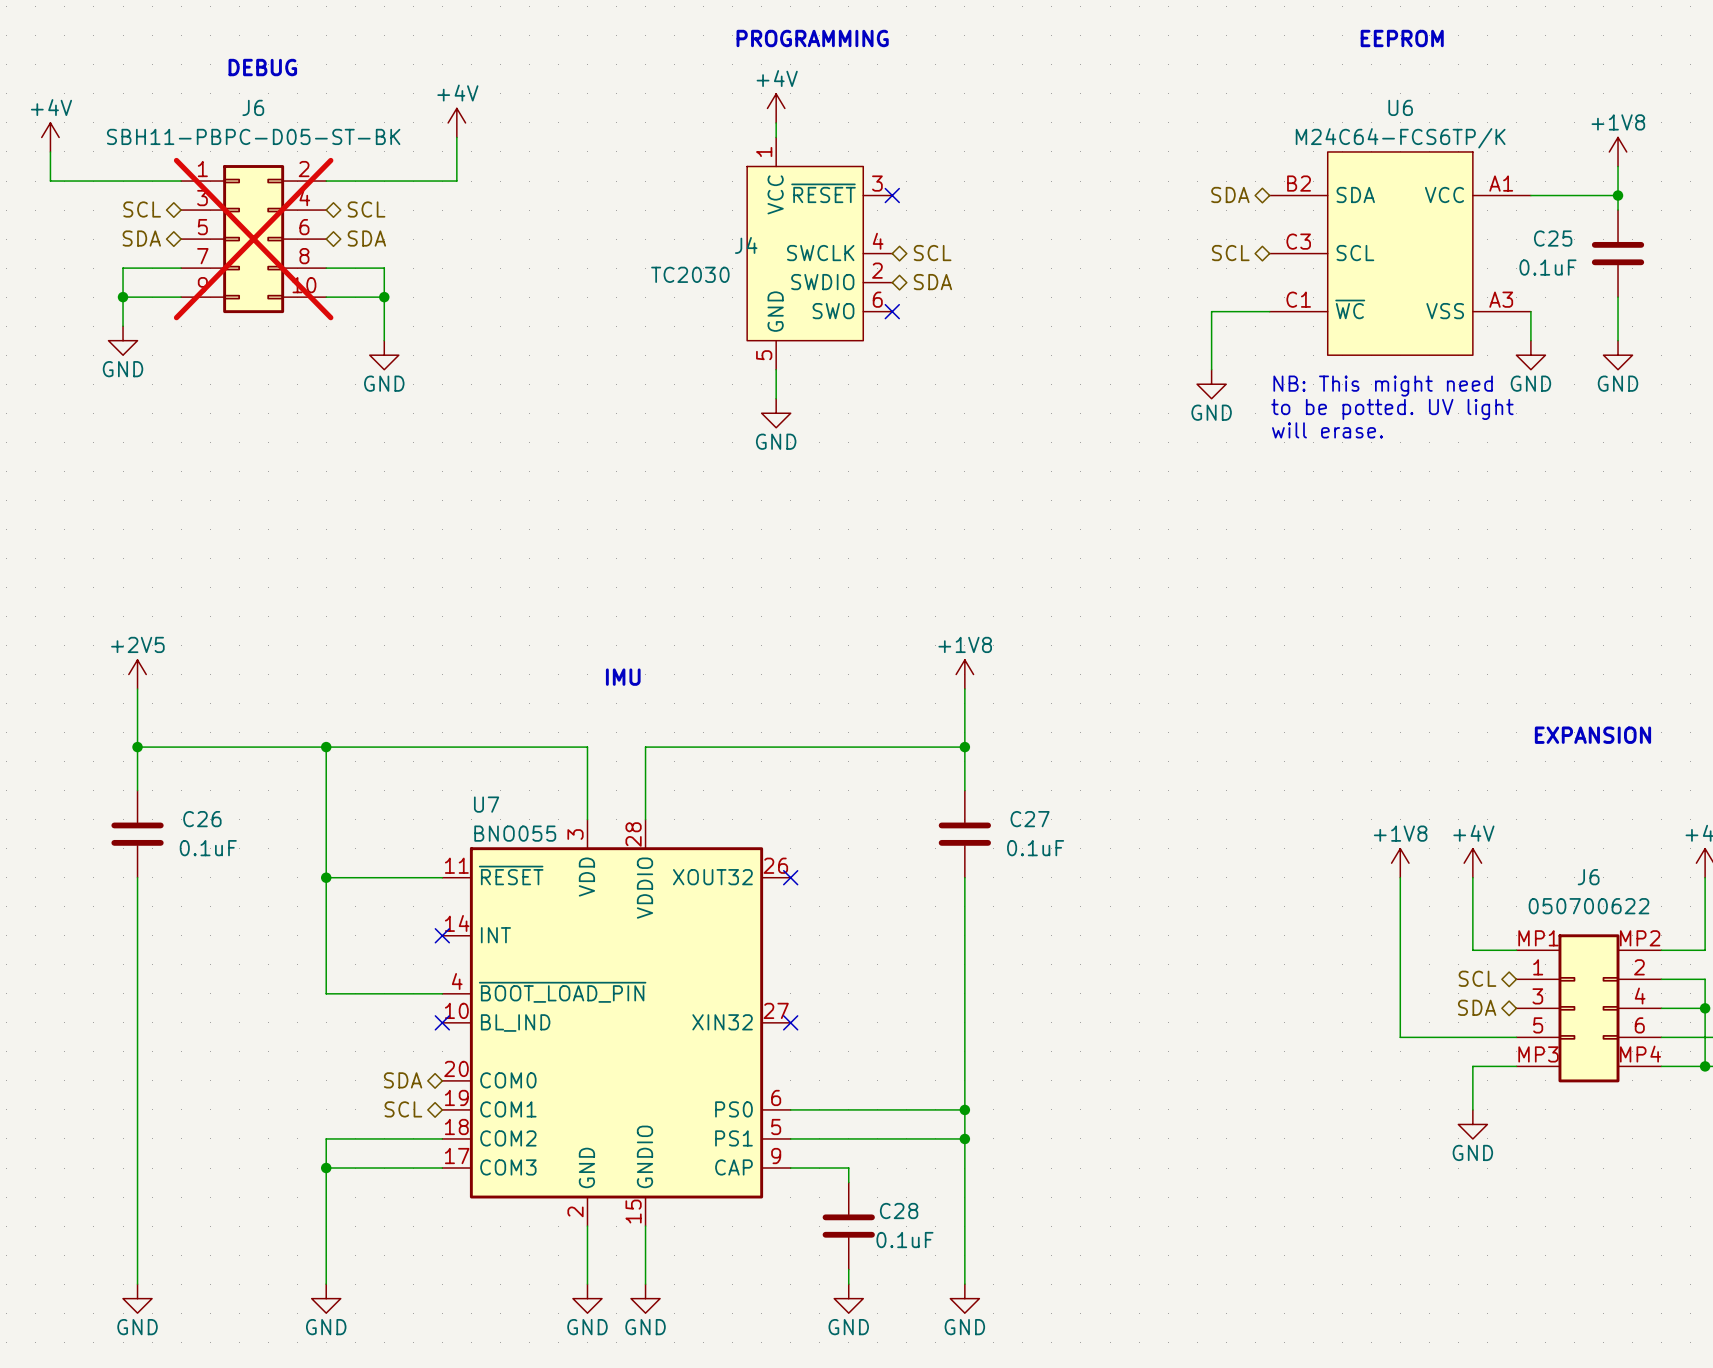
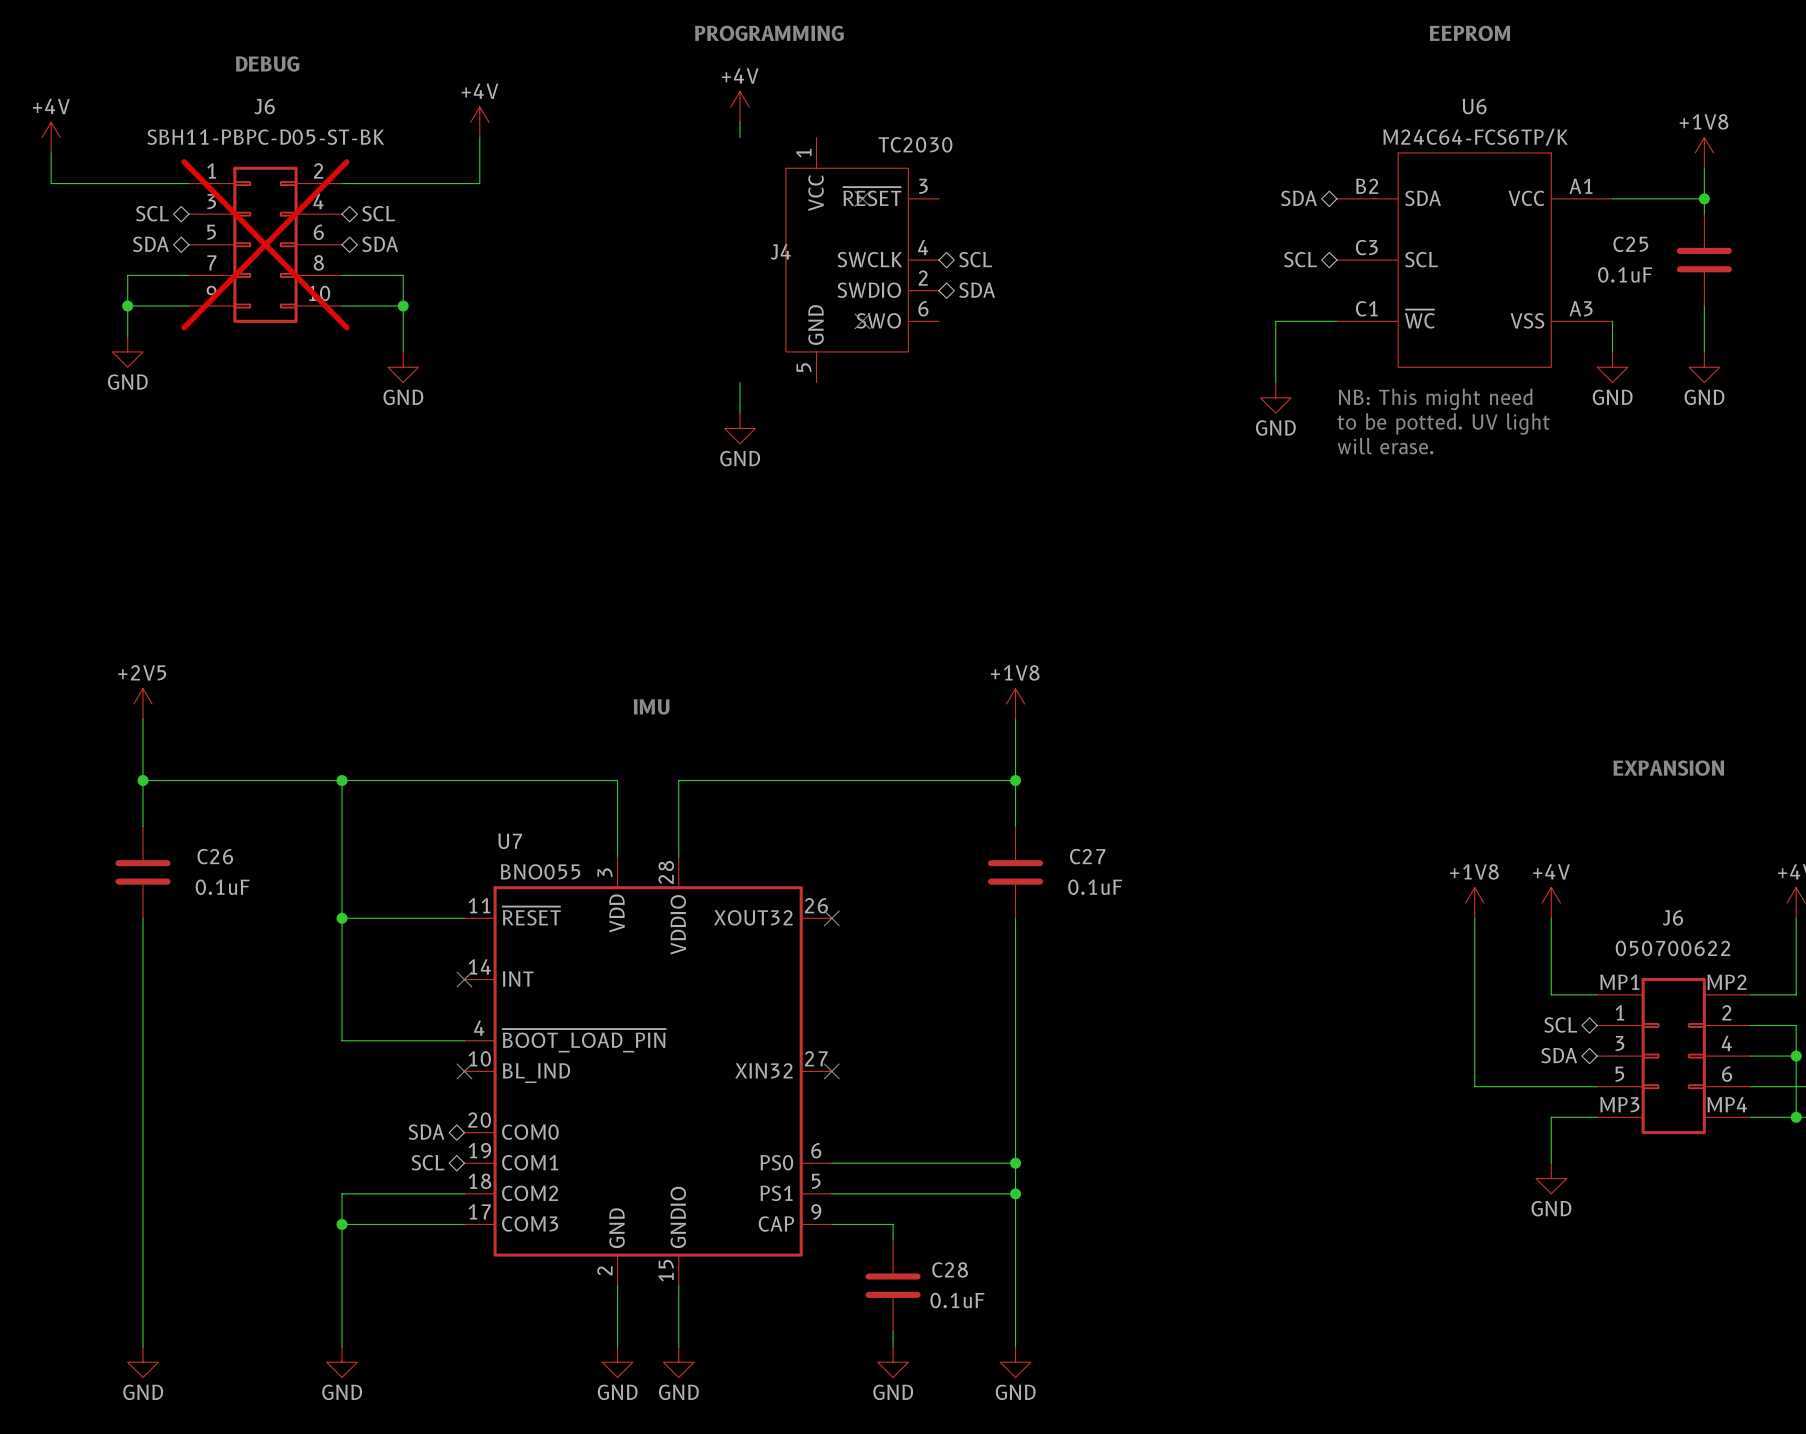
text position: PROGRAMMING (812, 38) -> PROGRAMMING (769, 33)
power symbol position: +4V (776, 108) -> +4V (739, 107)
wire: (776, 122) (776, 137) -> (739, 122) (739, 137)
no-connect mark: none -> (862, 198)
no-connect mark: (892, 195) -> none
J4 value position: TC2030 (690, 274) -> TC2030 (915, 144)
no-connect mark: none -> (862, 321)
no-connect mark: (892, 311) -> none
wire: (776, 369) (776, 398) -> (739, 382) (739, 413)
power symbol position: GND (776, 413) -> GND (739, 428)

